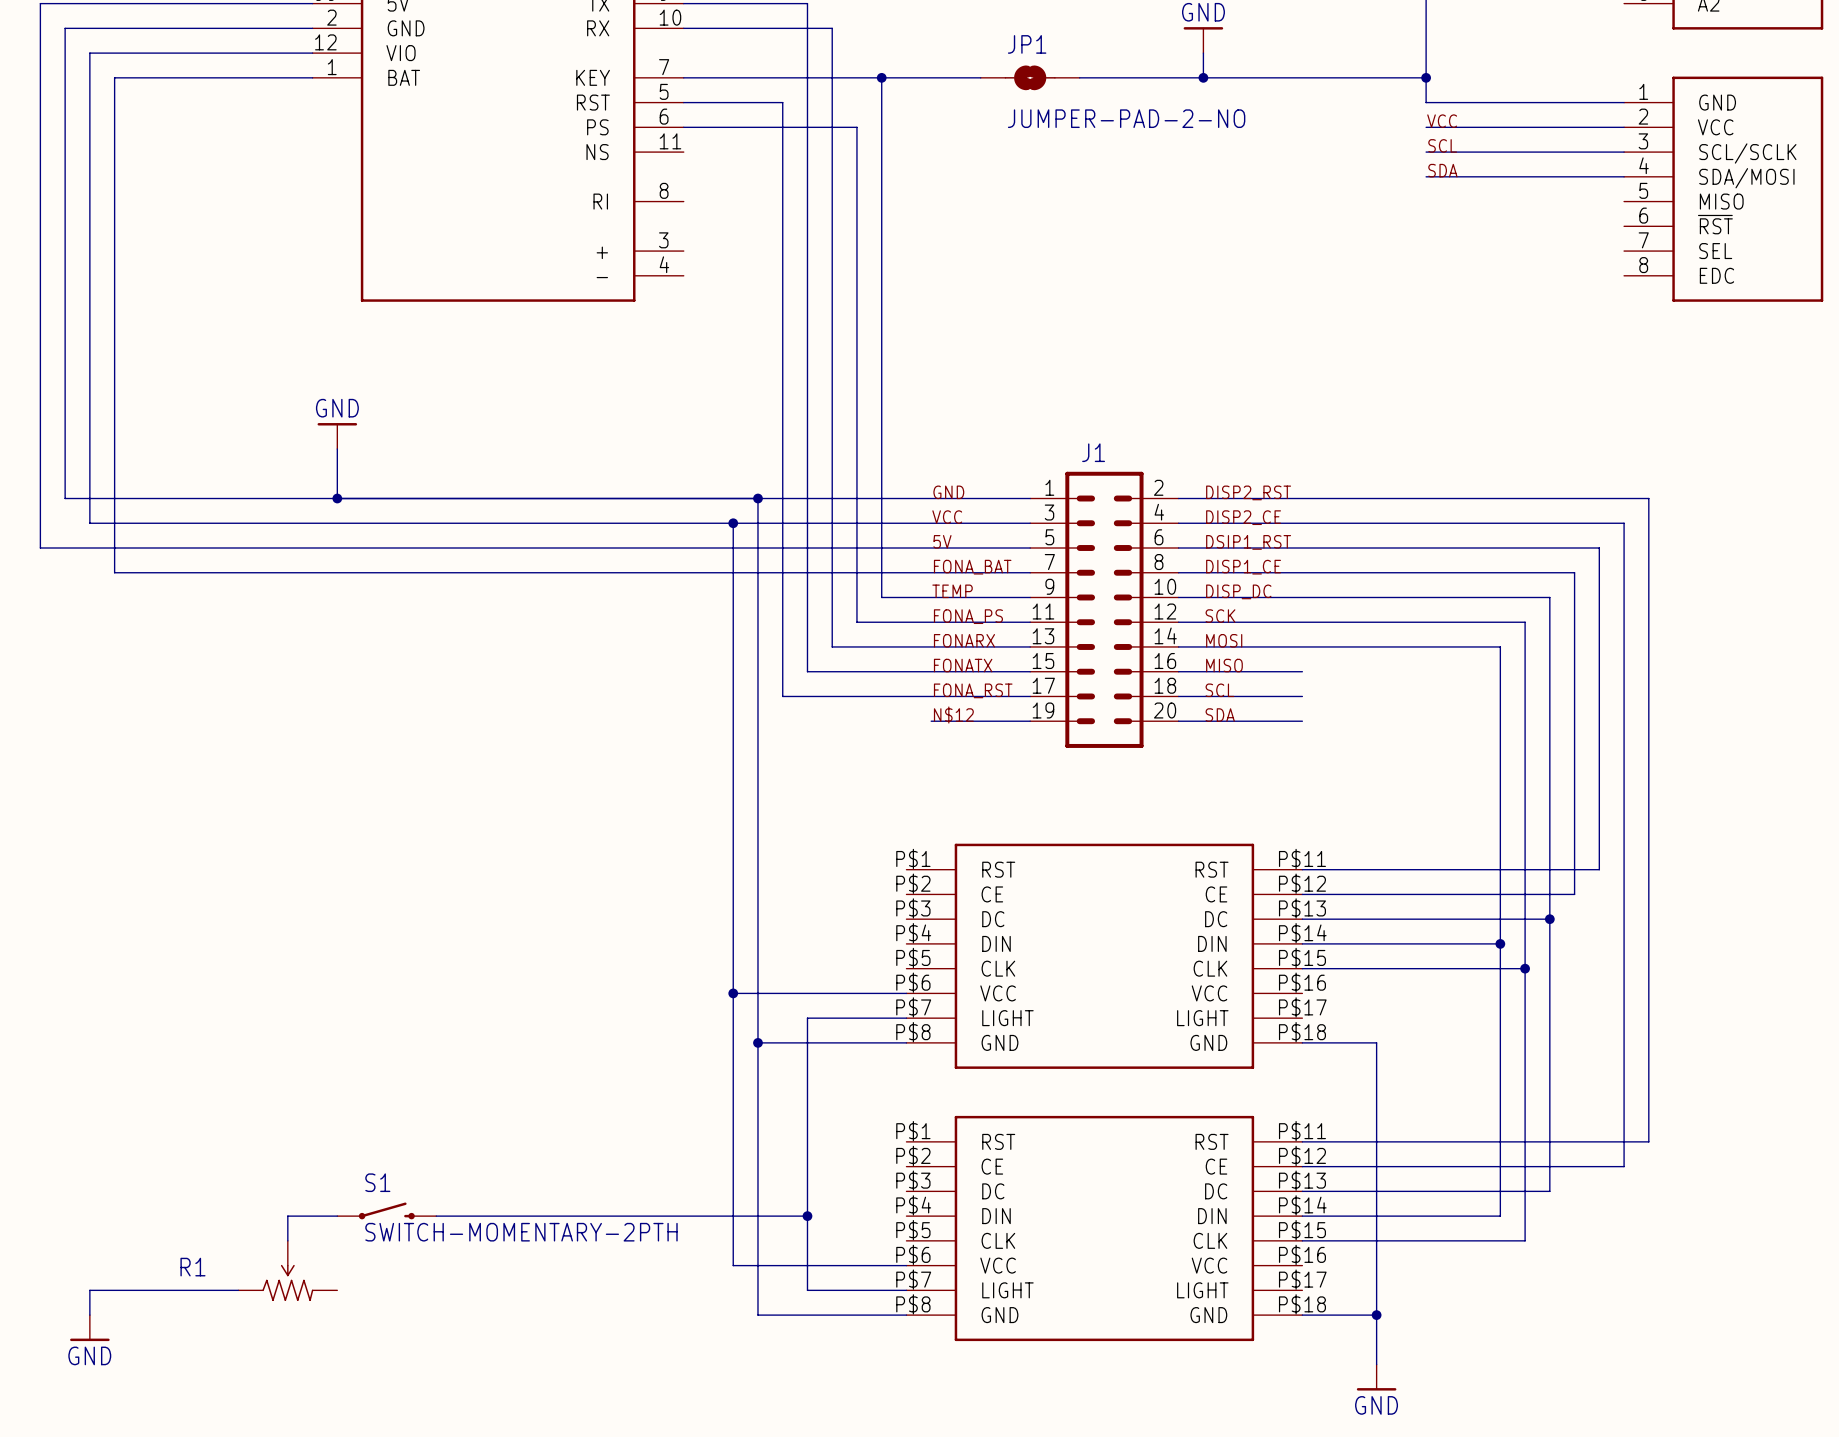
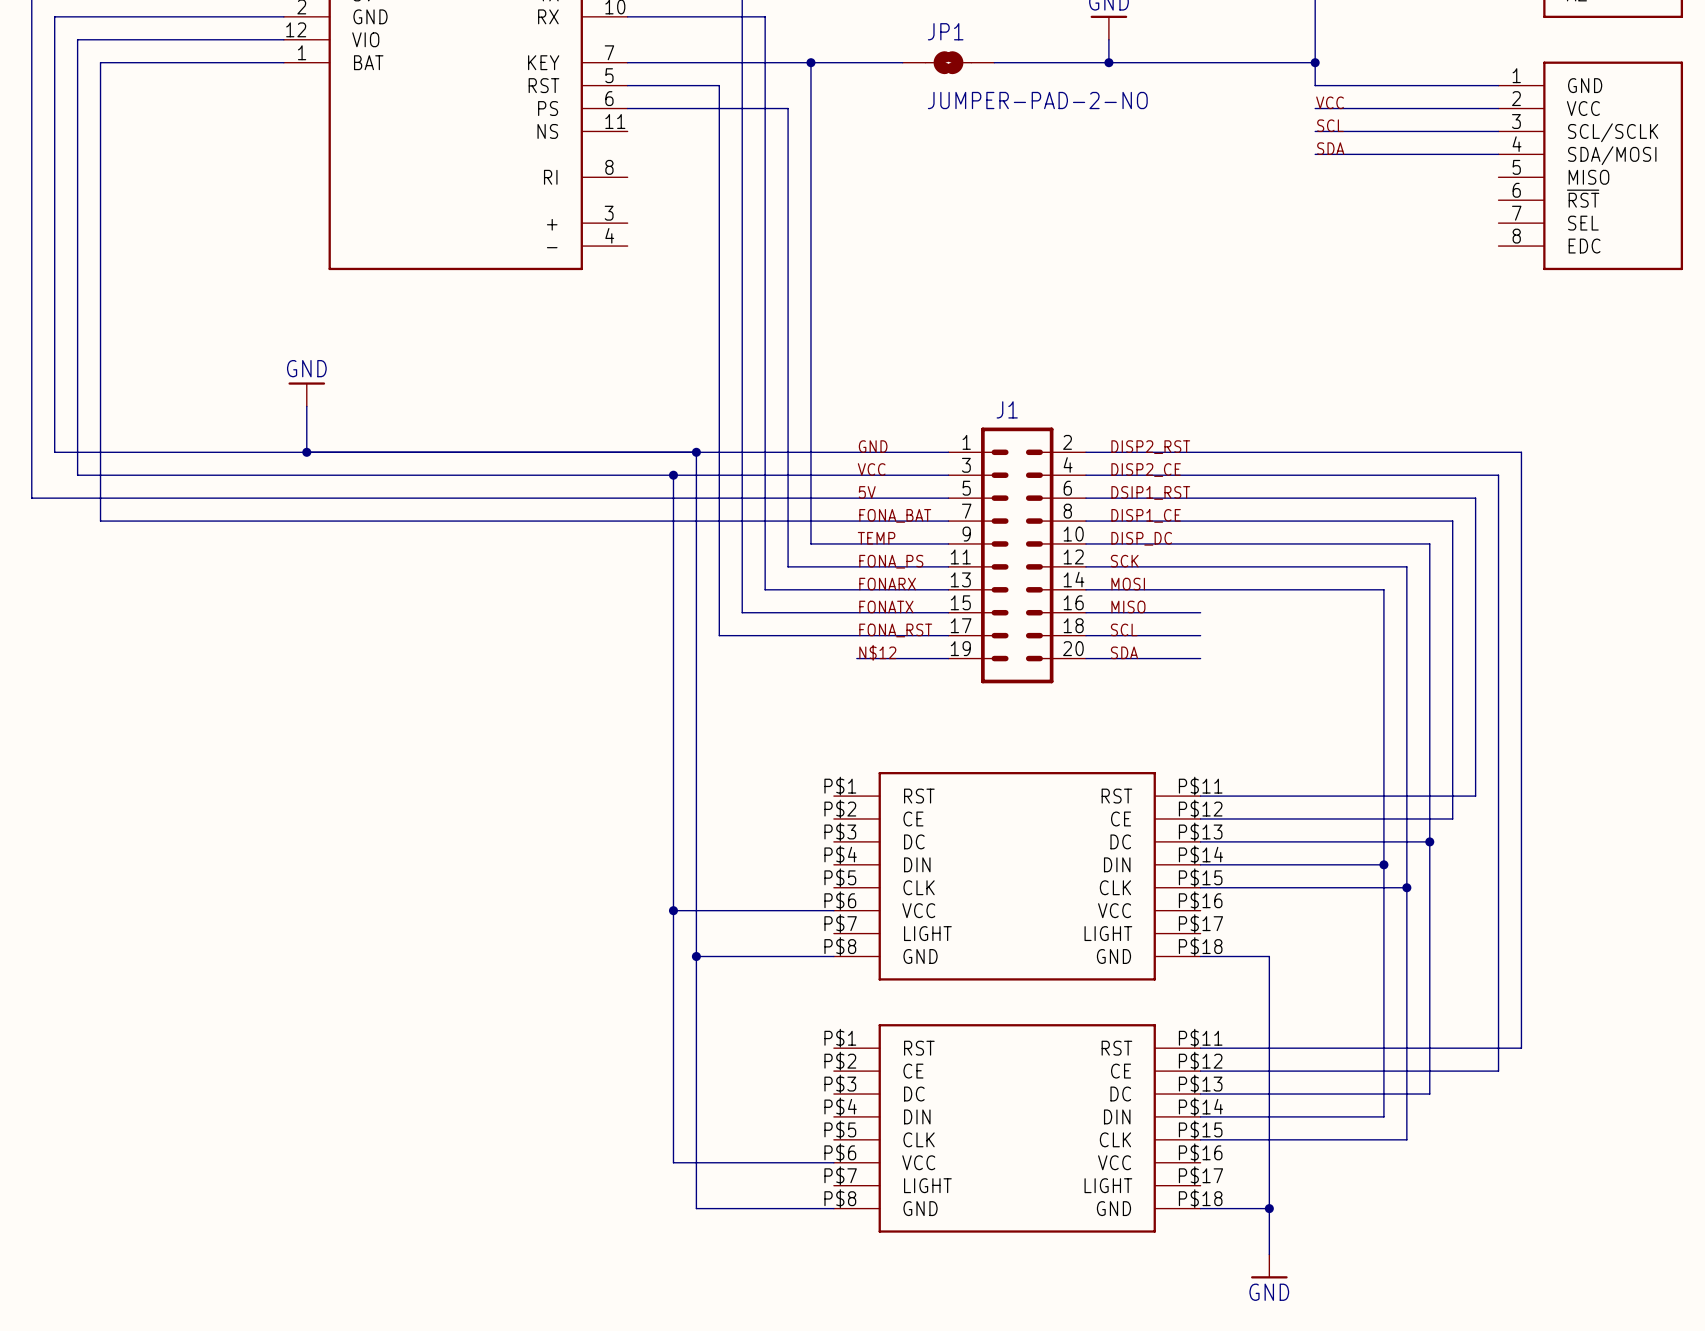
wire: (906, 1018) (807, 1018) (807, 1290) (906, 1290) -> none
S1: SWITCH-MOMENTARY-2PTH (386, 1210) -> none
wire: (337, 1216) (287, 1216) (287, 1240) -> none
wire: (436, 1216) (807, 1216) -> none
junction: (807, 1216) -> none
R1: (287, 1270) -> none
wire: (238, 1290) (89, 1290) (89, 1315) -> none
power symbol: GND (89, 1328) -> none

